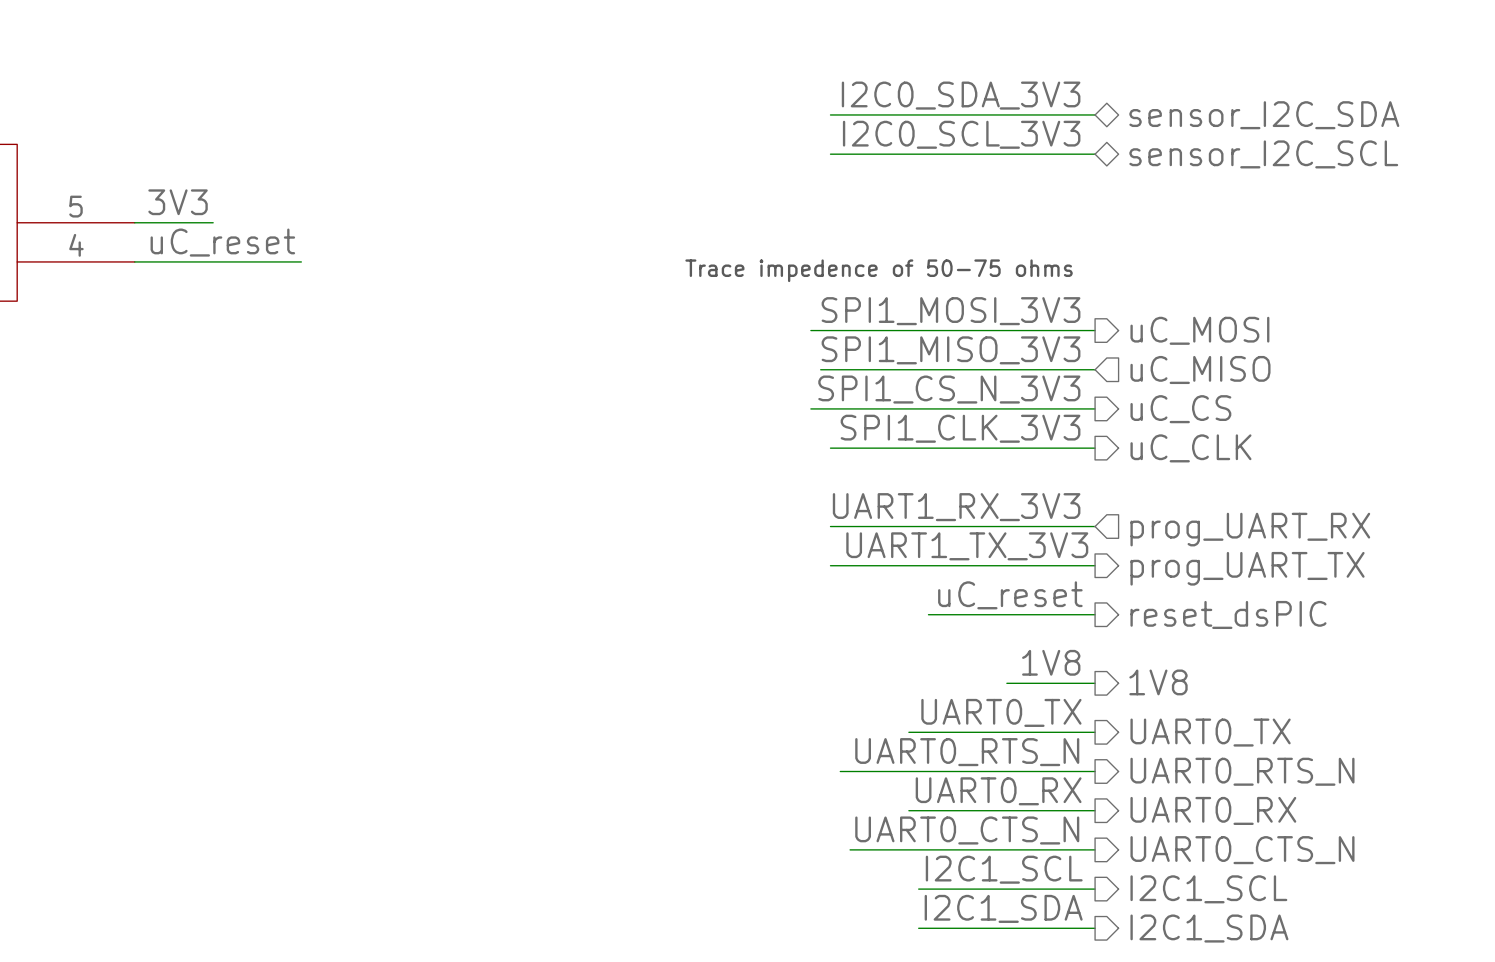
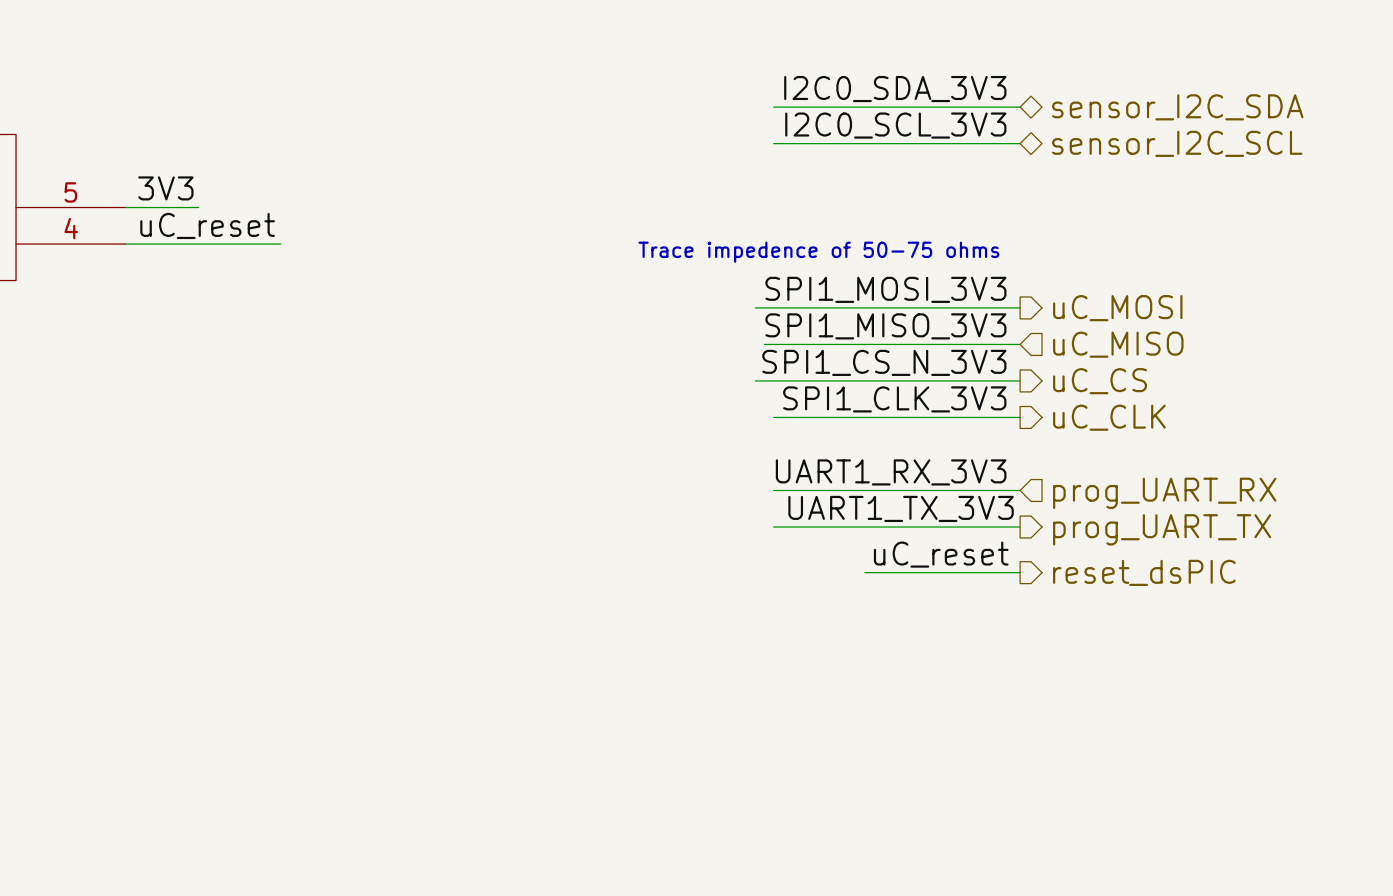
label: 1V8 (1051, 662) -> none
hierarchical label: 1V8 (1158, 682) -> none
wire: (1006, 683) (1095, 683) -> none
label: UART0_TX (1001, 712) -> none
wire: (908, 732) (1095, 732) -> none
hierarchical label: UART0_TX (1210, 732) -> none
label: UART0_RTS_N (967, 752) -> none
wire: (840, 771) (1095, 771) -> none
hierarchical label: UART0_RTS_N (1242, 771) -> none
label: UART0_RX (998, 791) -> none
wire: (908, 810) (1095, 810) -> none
hierarchical label: UART0_RX (1213, 810) -> none
label: UART0_CTS_N (967, 830) -> none
wire: (850, 849) (1095, 849) -> none
hierarchical label: UART0_CTS_N (1242, 850) -> none
label: I2C1_SCL (1004, 869) -> none
wire: (918, 889) (1095, 889) -> none
hierarchical label: I2C1_SCL (1208, 889) -> none
label: I2C1_SDA (1003, 908) -> none
wire: (918, 928) (1095, 928) -> none
hierarchical label: I2C1_SDA (1209, 928) -> none

